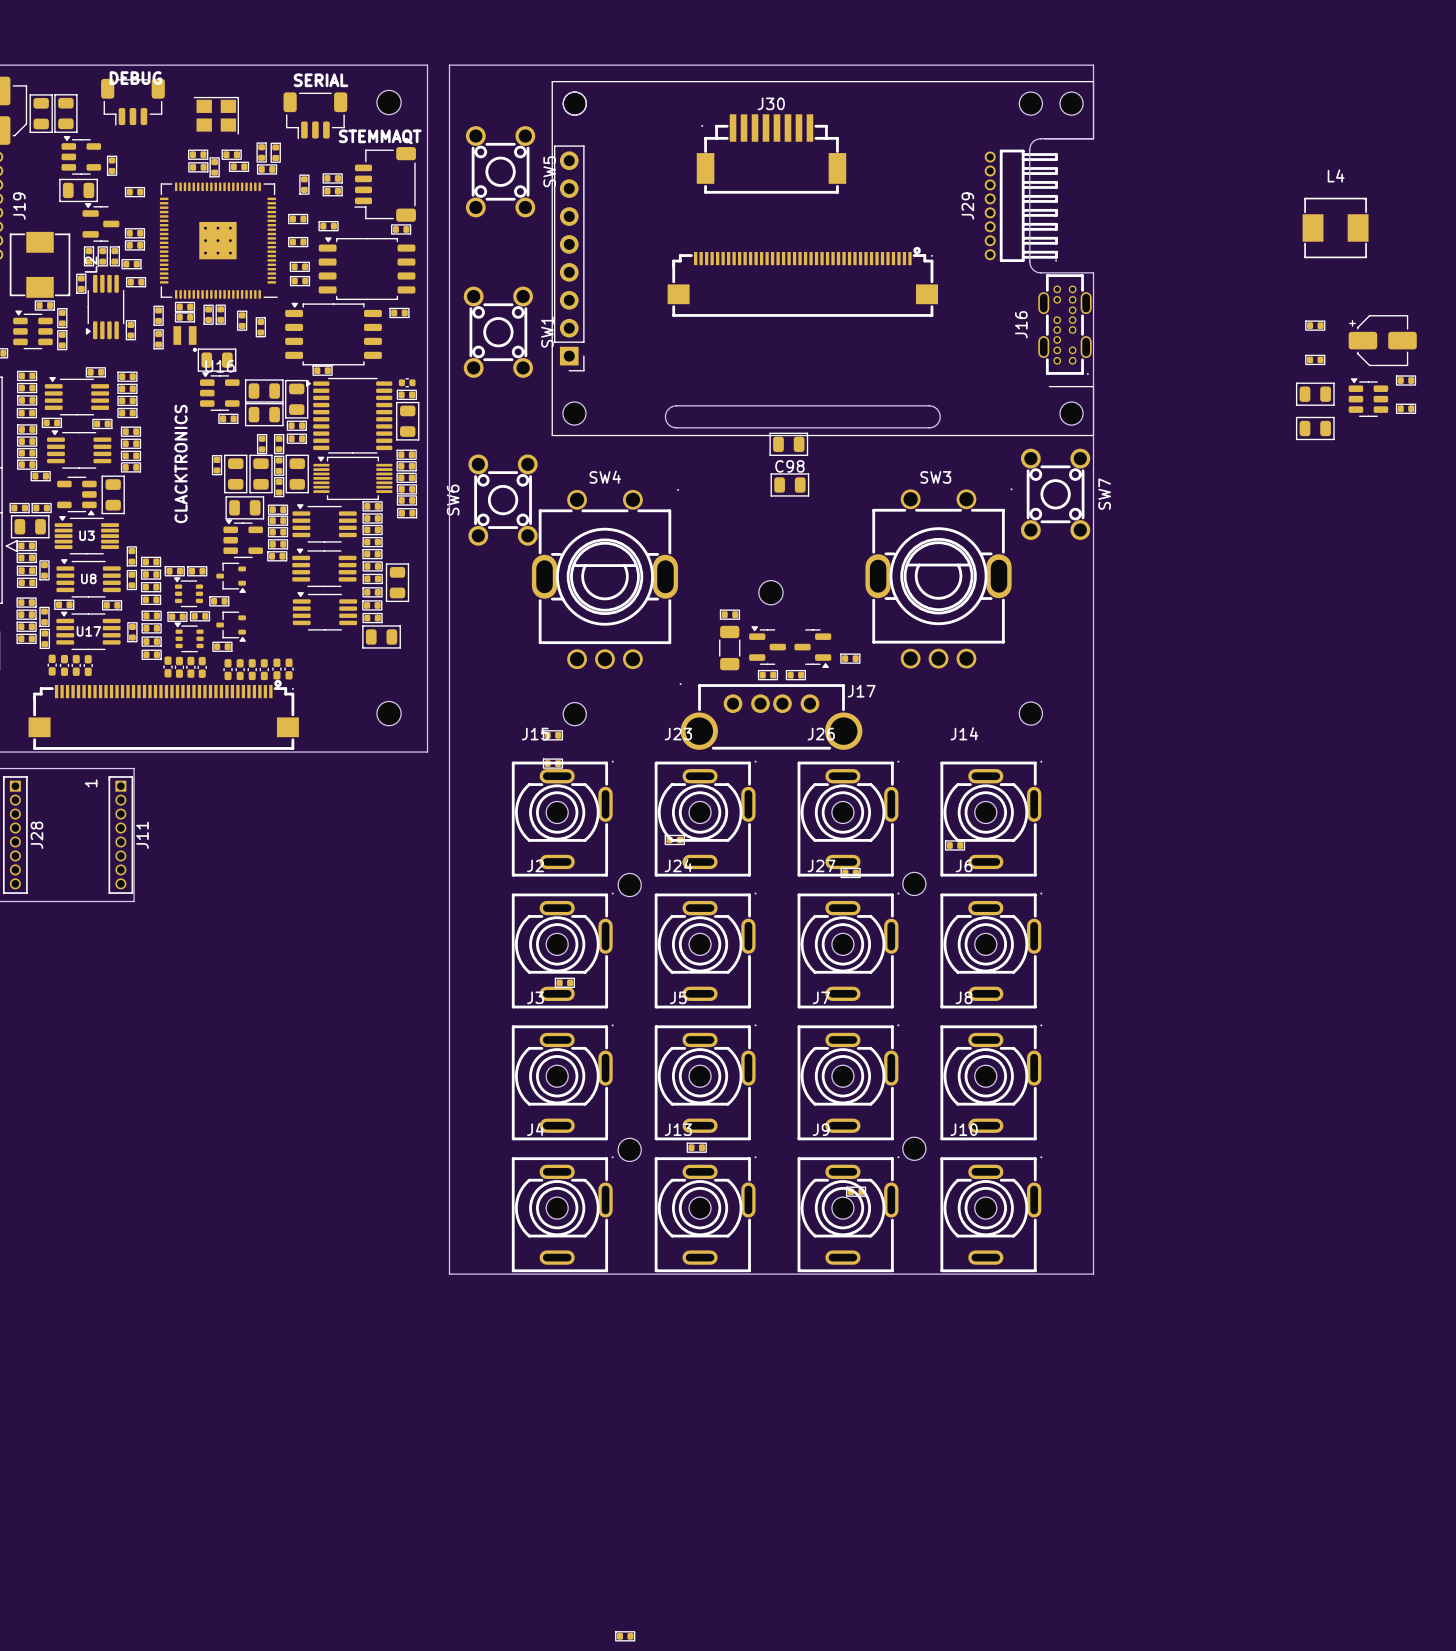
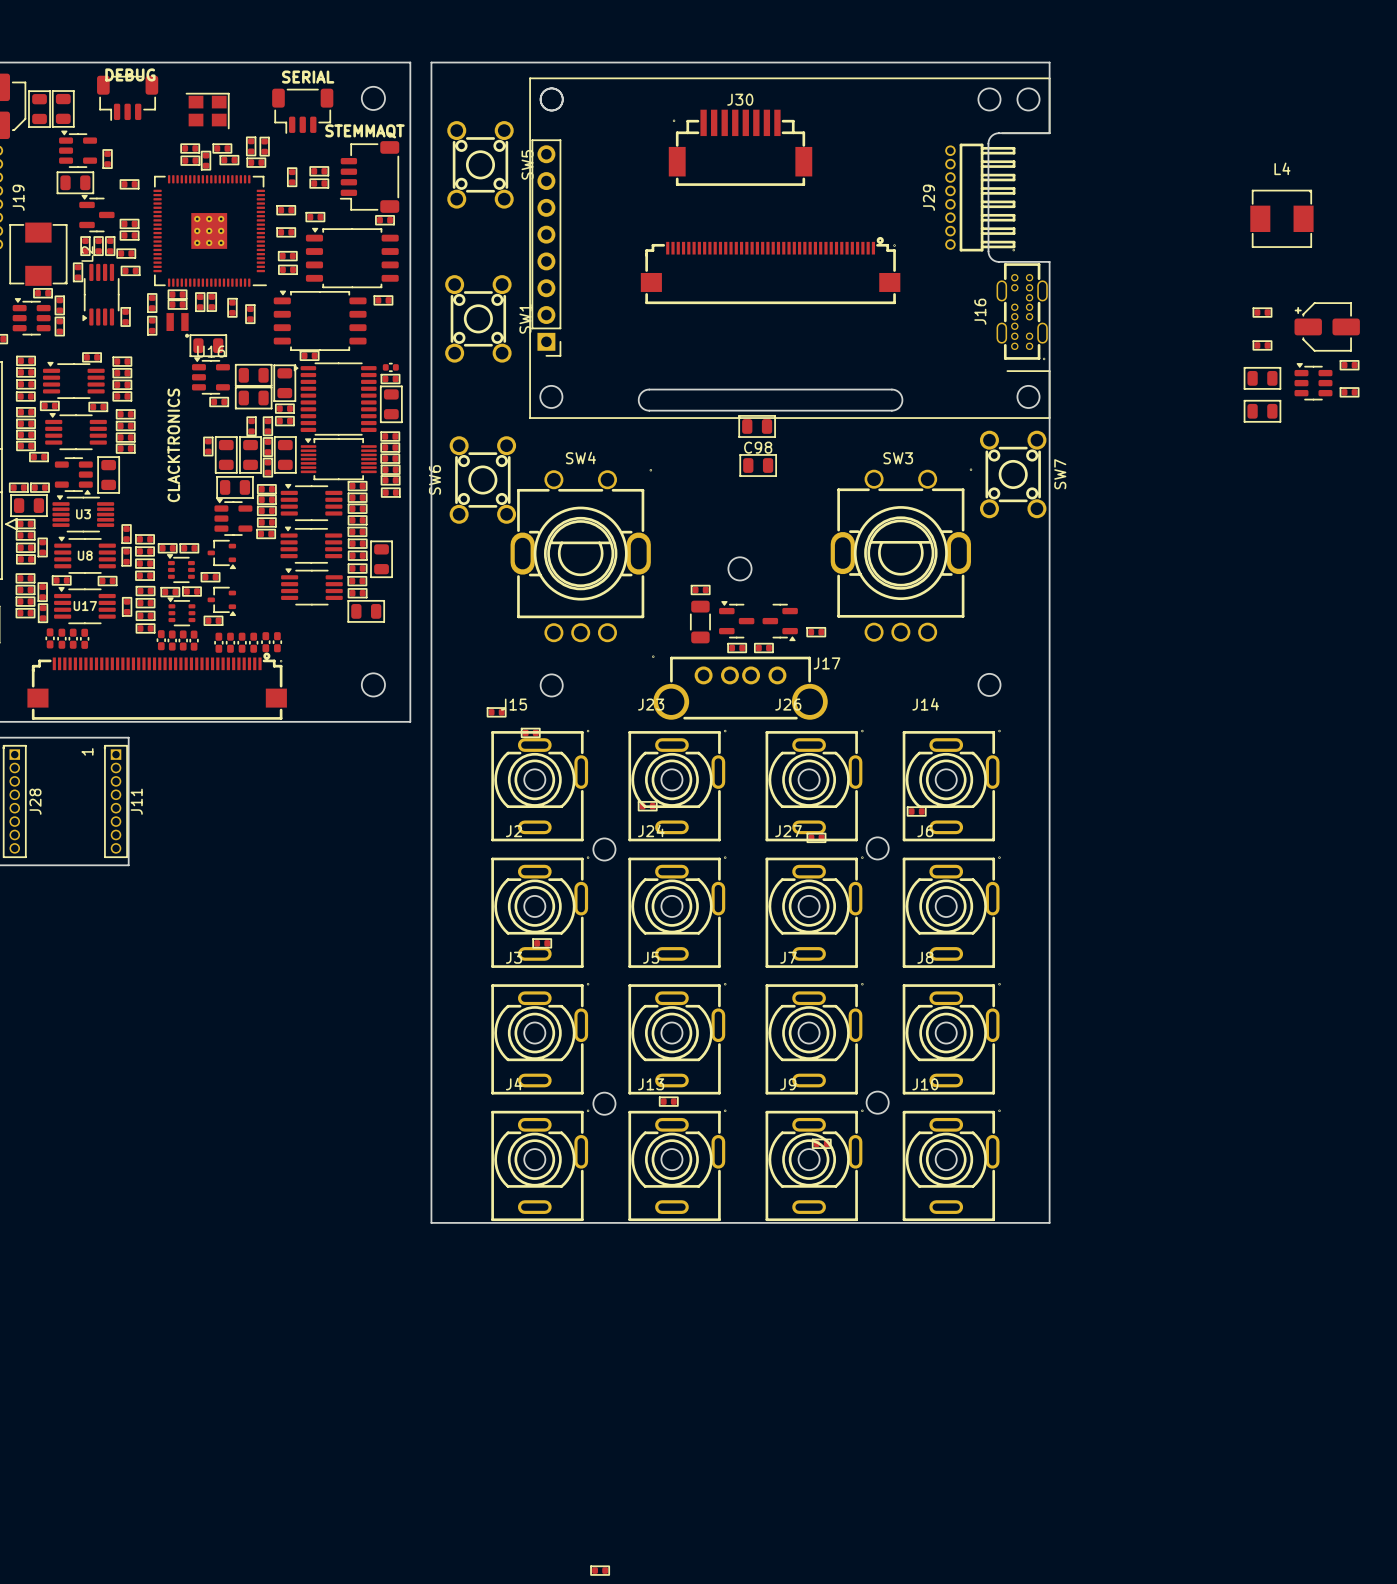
part position: (552, 735) -> (496, 712)

